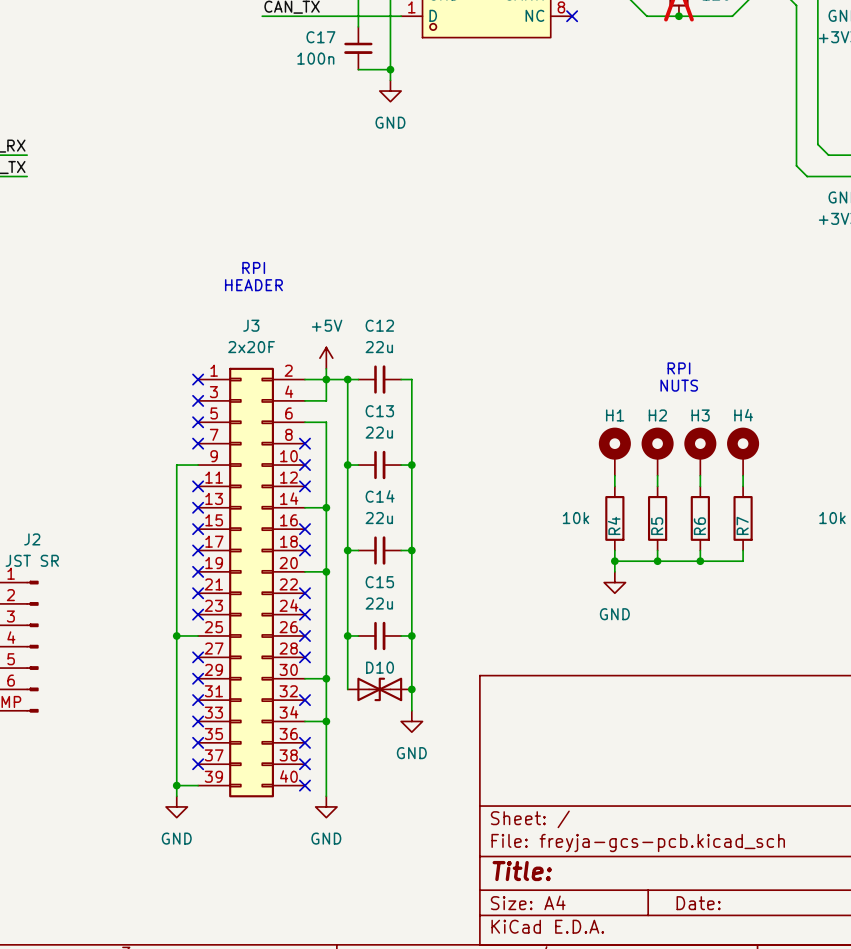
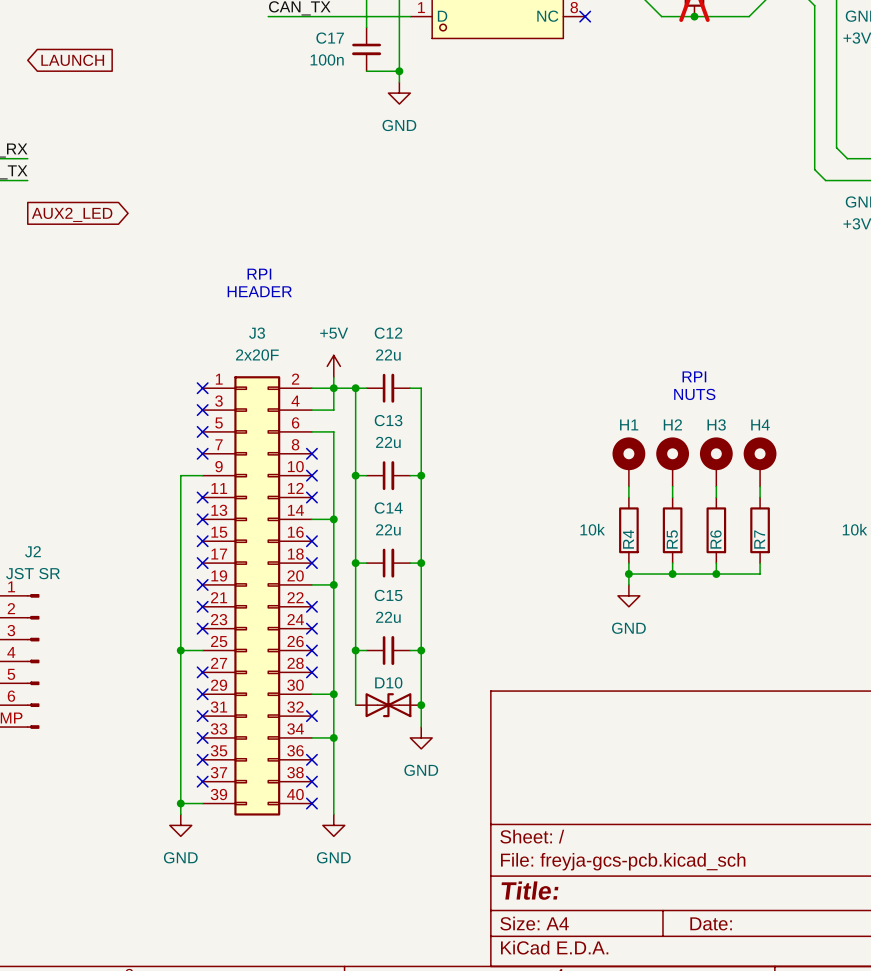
global label: none -> LAUNCH (72, 60)
global label: none -> AUX2_LED (72, 214)

